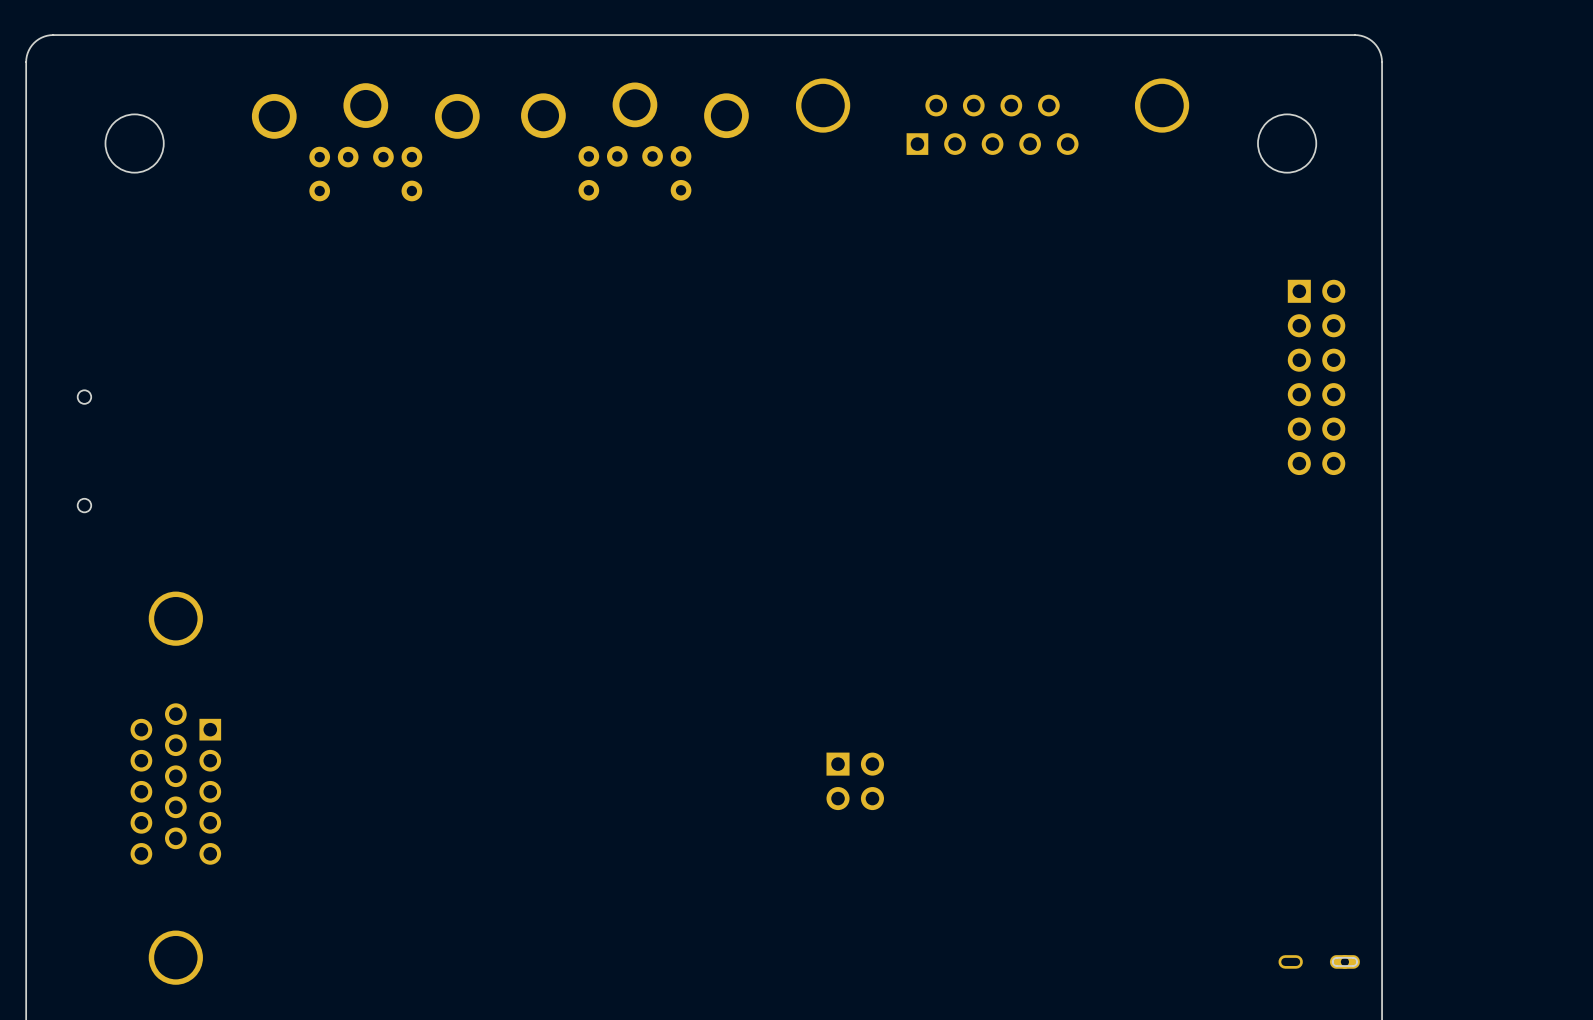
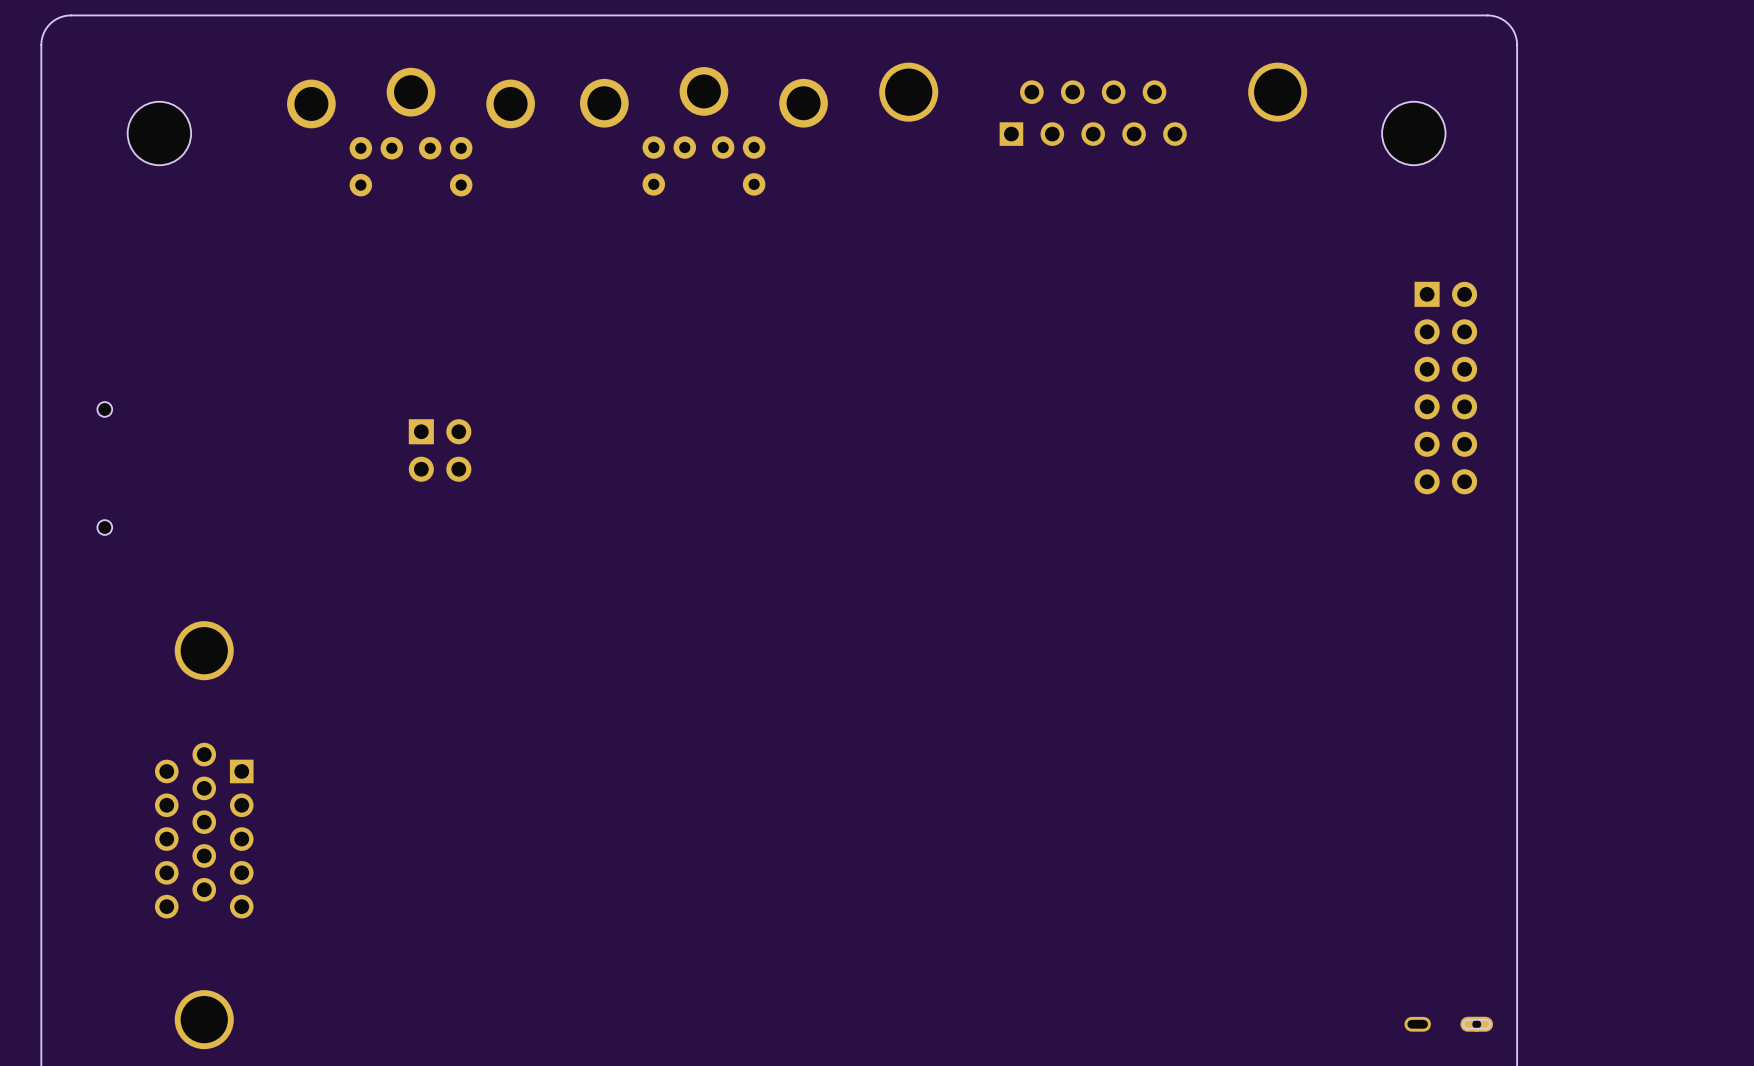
part: none -> (440, 450)
part: (855, 781) -> none

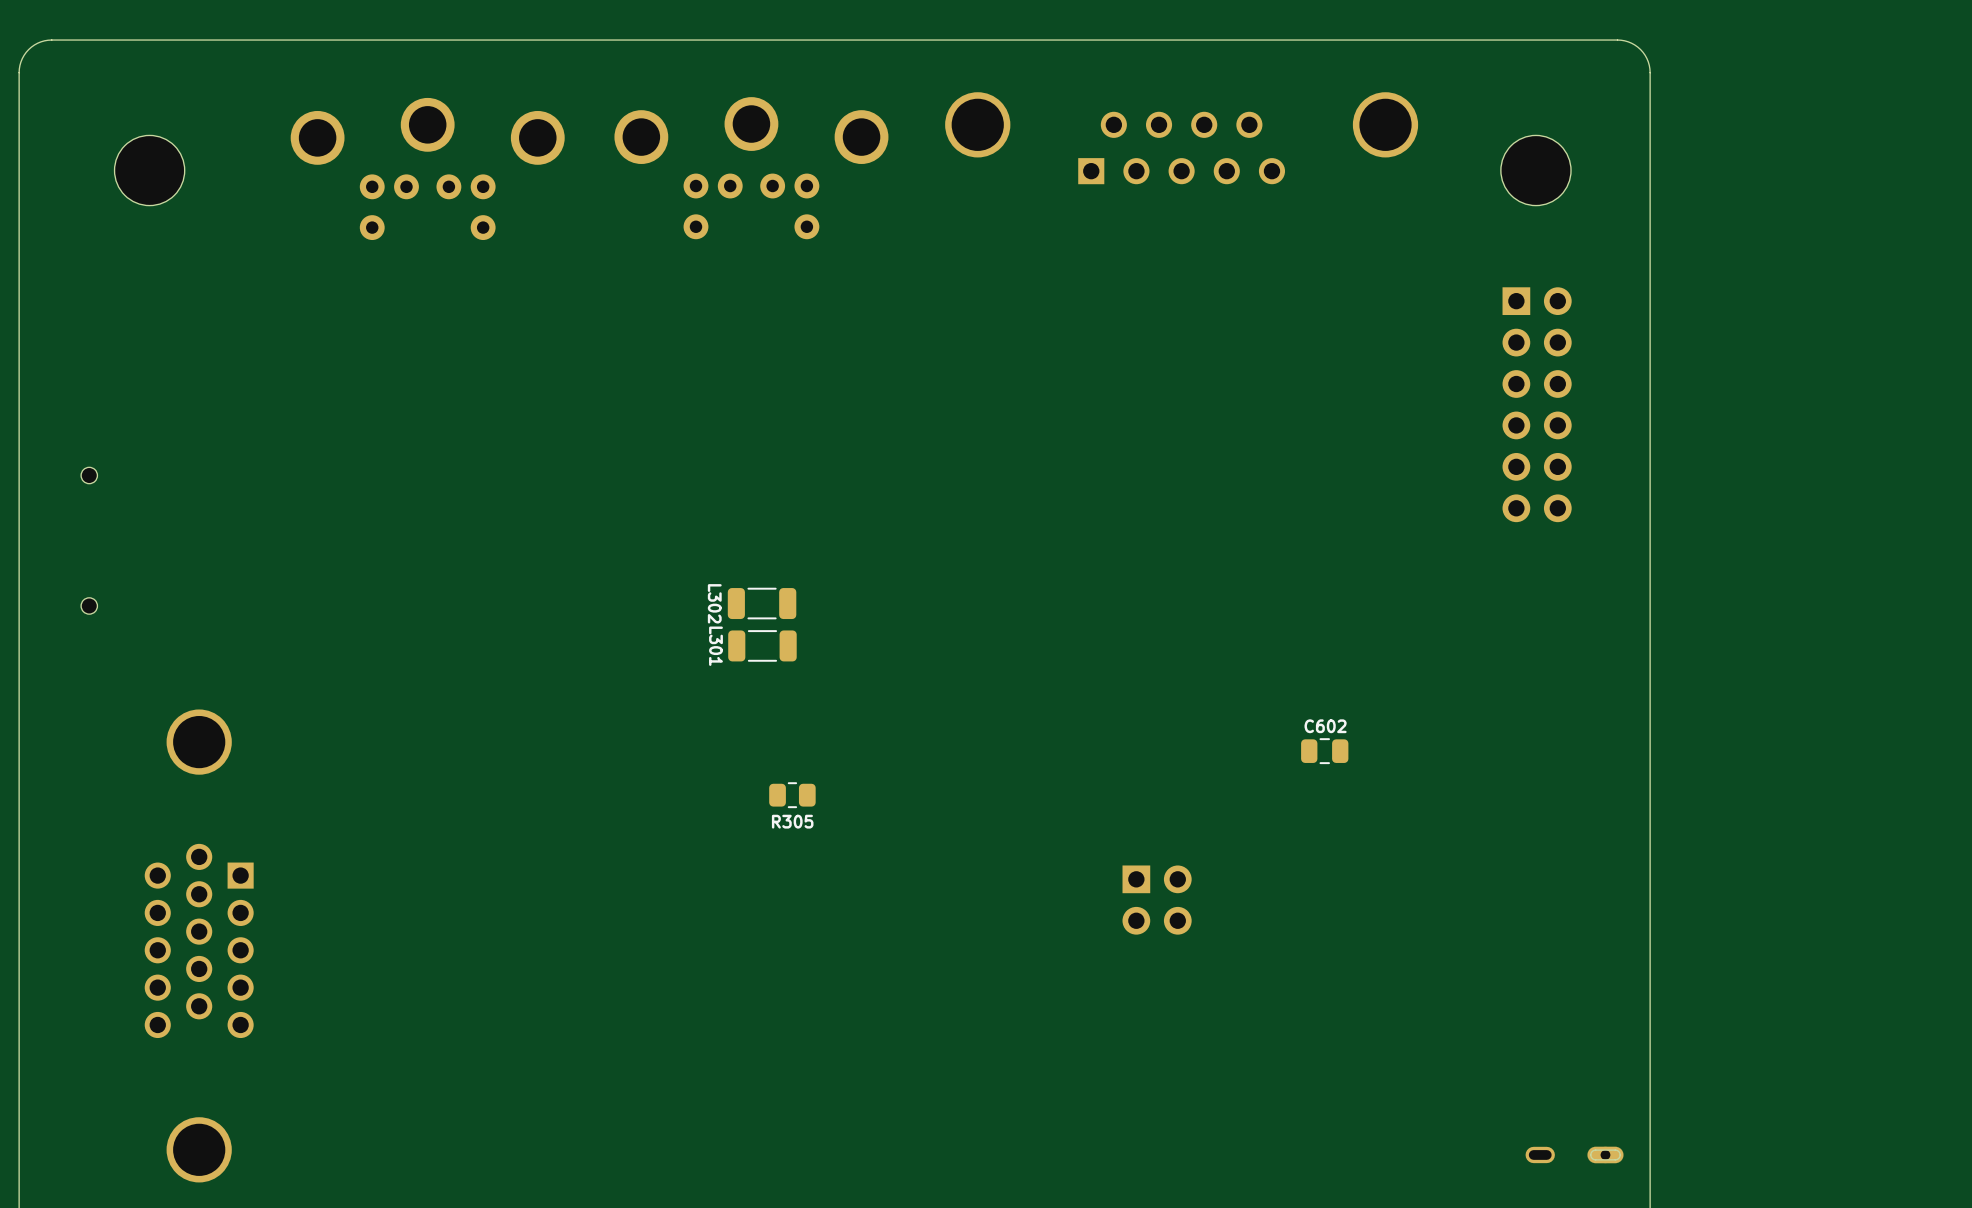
part position: (1445, 388) -> (1537, 404)
part: (440, 450) -> none
L302: none -> (762, 603)
L301: none -> (762, 645)
C602: none -> (1324, 751)
R305: none -> (792, 795)
part: none -> (1157, 900)

